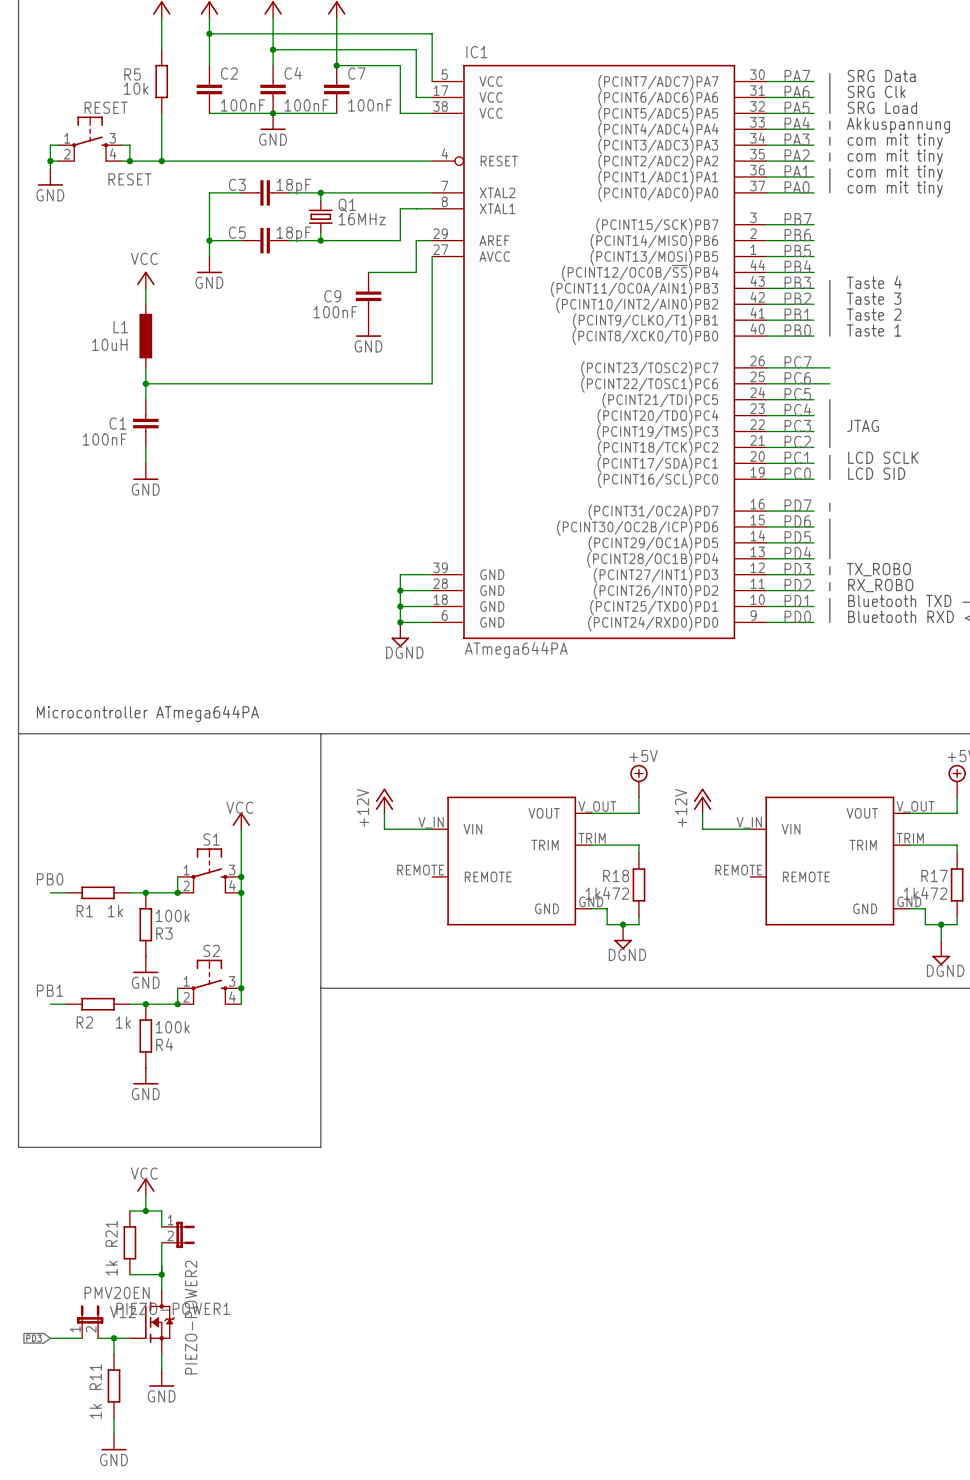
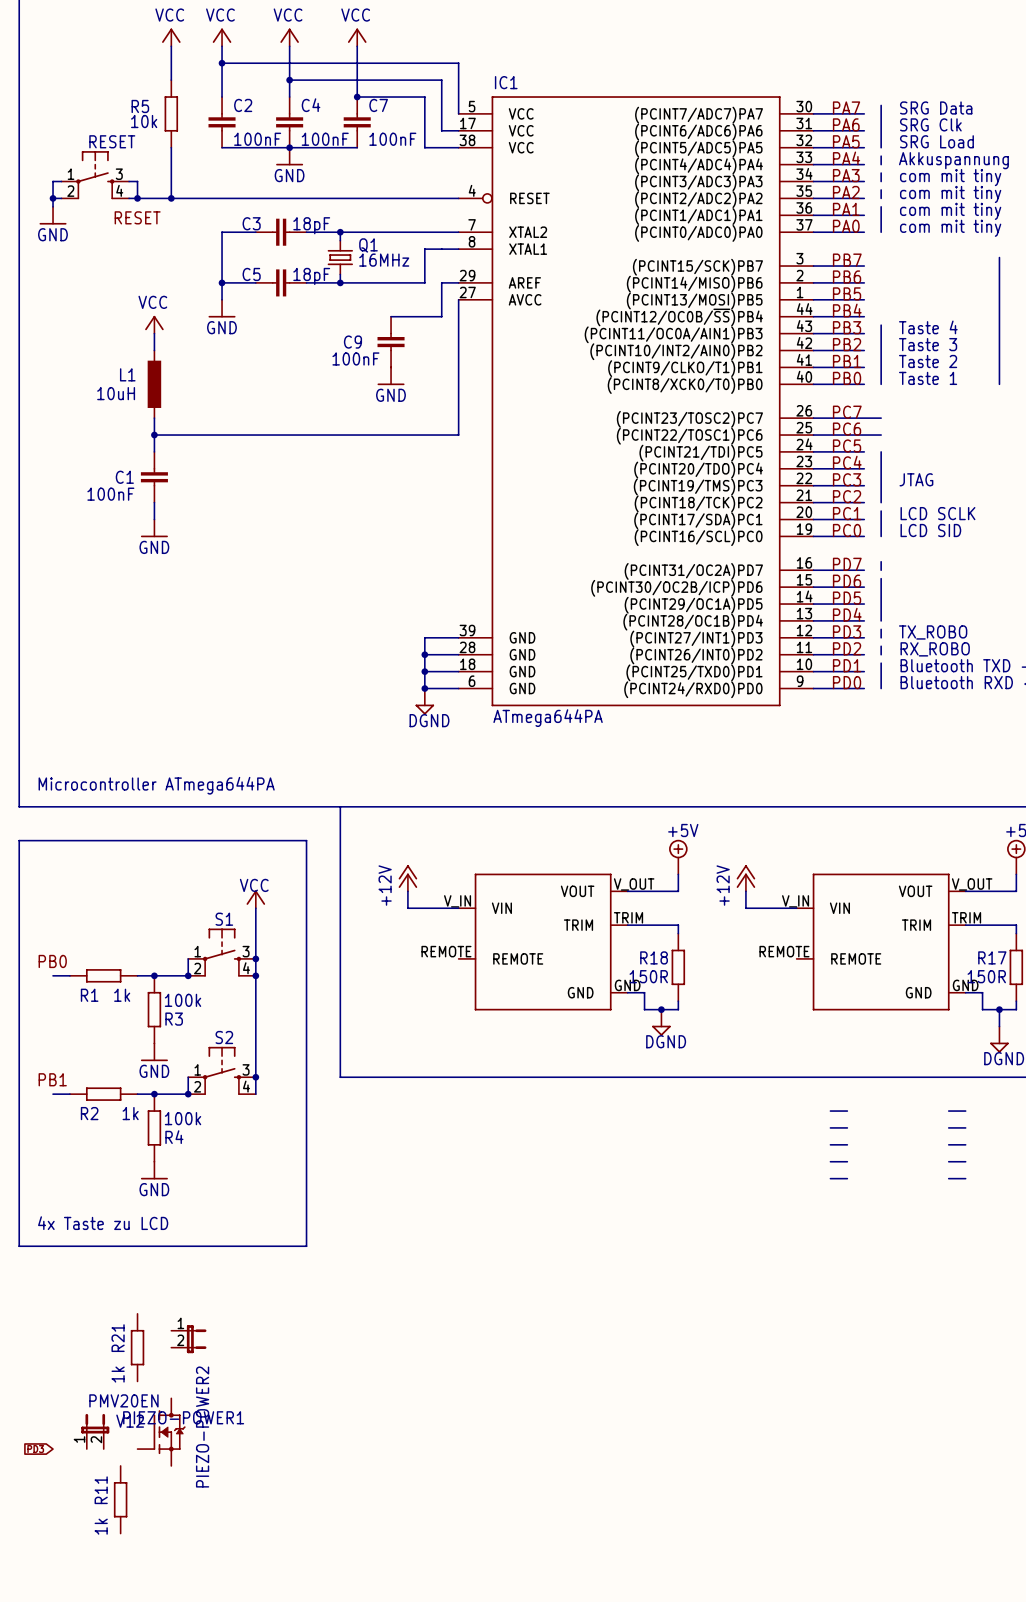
line: none -> (999, 257) (999, 384)
line: (18, 733) (18, 765) -> none
R18 value: 1k472 (607, 893) -> 150R (648, 976)
R17 value: 1k472 (925, 893) -> 150R (986, 976)
line: (320, 988) (320, 1147) (288, 1147) -> (19, 840) (306, 840) (306, 1246)
wire: none -> (830, 1111) (847, 1111)
wire: none -> (948, 1111) (965, 1111)
wire: none -> (830, 1127) (847, 1127)
wire: none -> (948, 1127) (965, 1127)
wire: none -> (830, 1144) (847, 1144)
wire: none -> (948, 1144) (965, 1144)
wire: none -> (830, 1161) (847, 1161)
wire: none -> (948, 1161) (965, 1161)
wire: none -> (830, 1178) (847, 1178)
wire: none -> (948, 1178) (965, 1178)
text: none -> 4x Taste zu LCD (103, 1223)
power symbol: VCC (145, 1186) -> none
wire: (145, 1195) (145, 1211) -> none
wire: (129, 1211) (161, 1211) (161, 1226) -> none
junction: (145, 1211) -> none
wire: (161, 1242) (161, 1290) -> none
wire: (129, 1274) (161, 1274) -> none
junction: (161, 1274) -> none
wire: (50, 1338) (82, 1338) -> none
wire: (98, 1338) (129, 1338) -> none
wire: (114, 1338) (114, 1354) -> none
junction: (114, 1338) -> none
wire: (161, 1354) (161, 1370) -> none
power symbol: GND (161, 1378) -> none
wire: (114, 1417) (114, 1433) -> none
power symbol: GND (114, 1442) -> none

